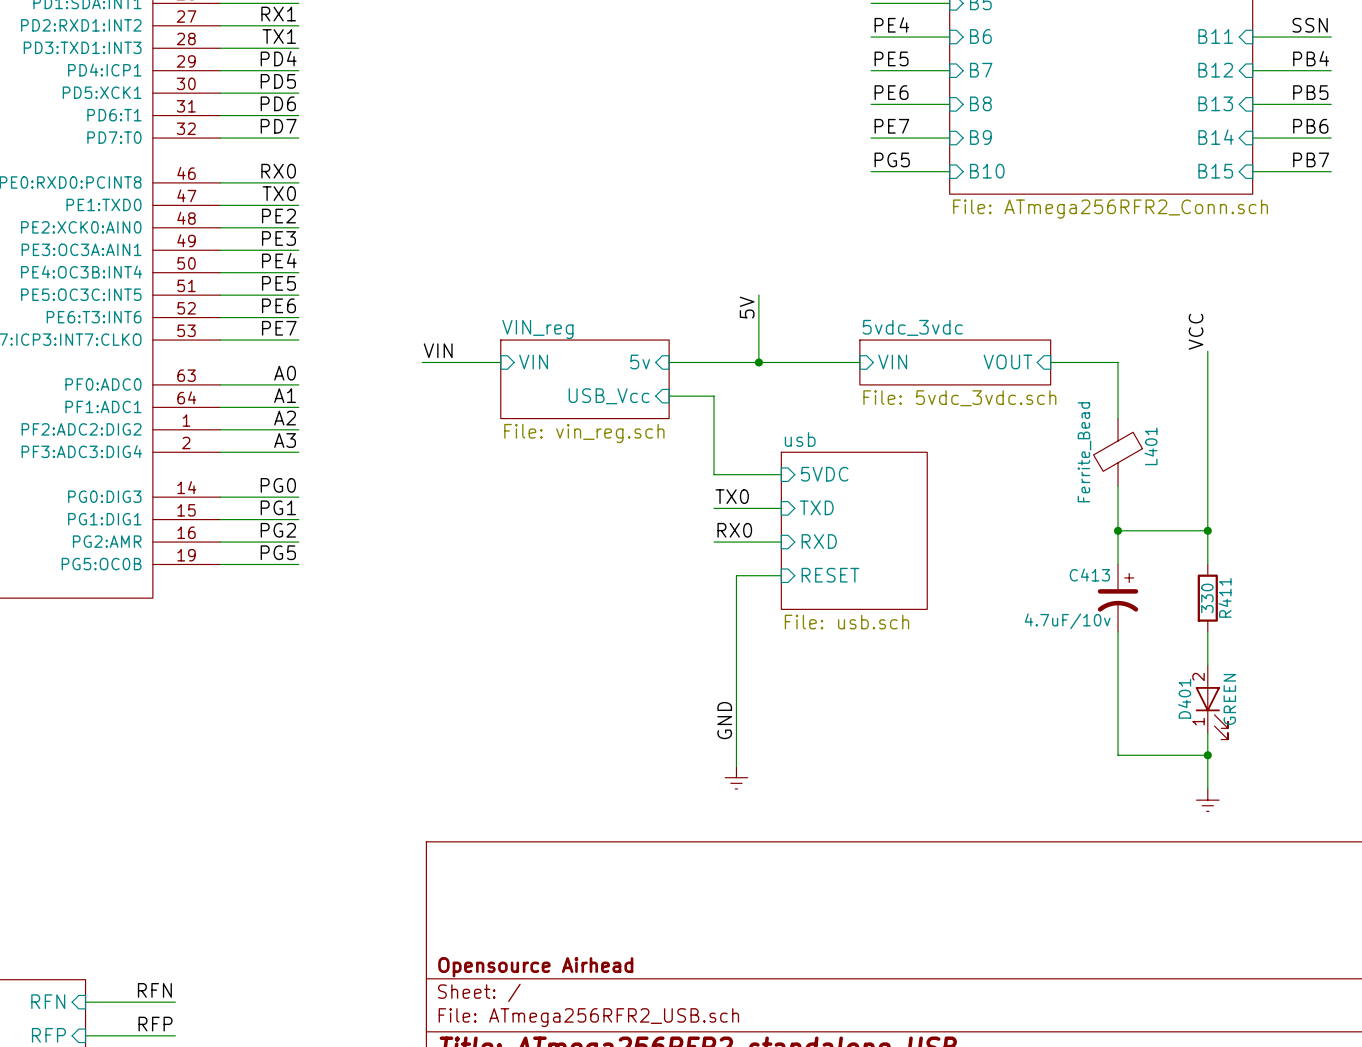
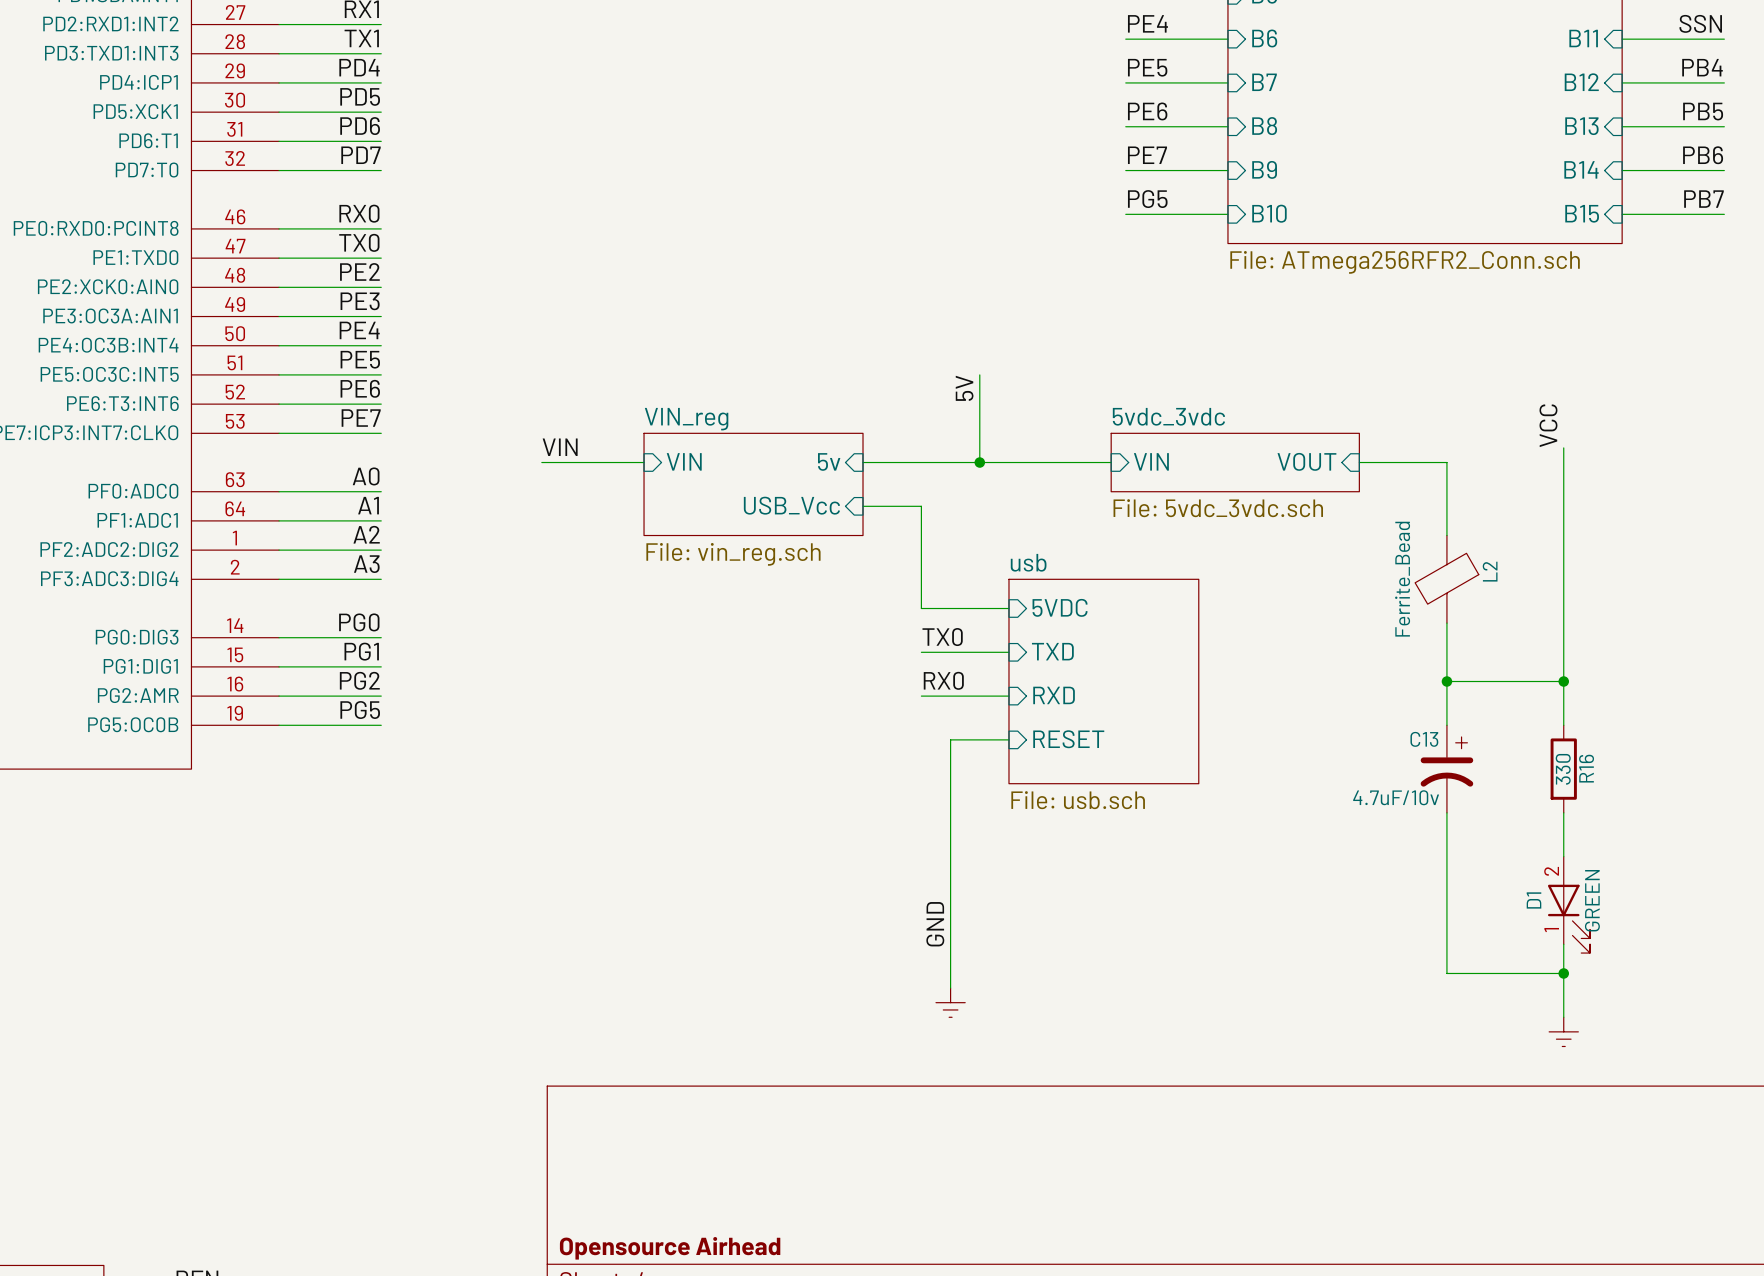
L401 name: L401 (1150, 446) -> L2 (1490, 571)
C413 name: C413 (1089, 575) -> C13 (1424, 739)
R411 name: R411 (1225, 597) -> R16 (1586, 768)
D401 name: D401 (1184, 698) -> D1 (1534, 900)

